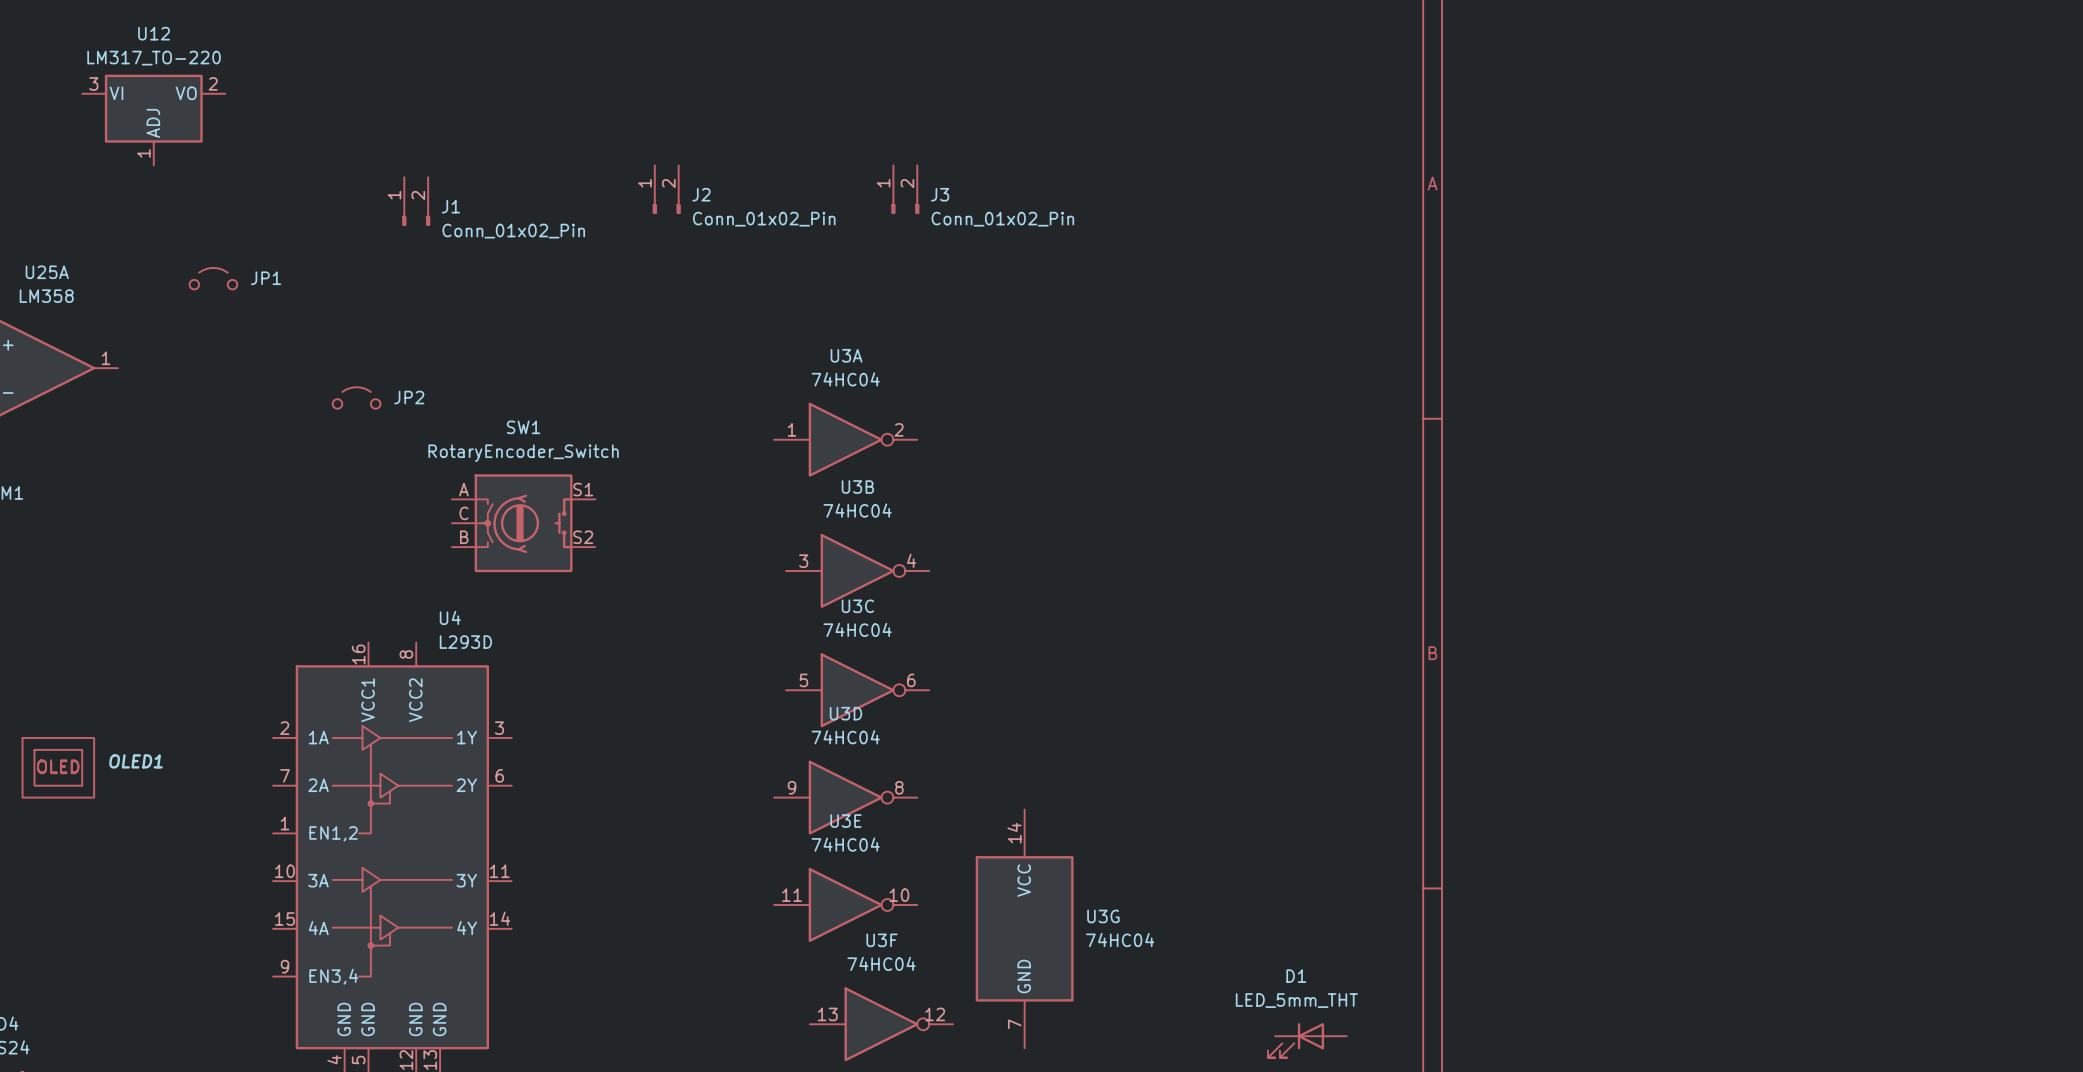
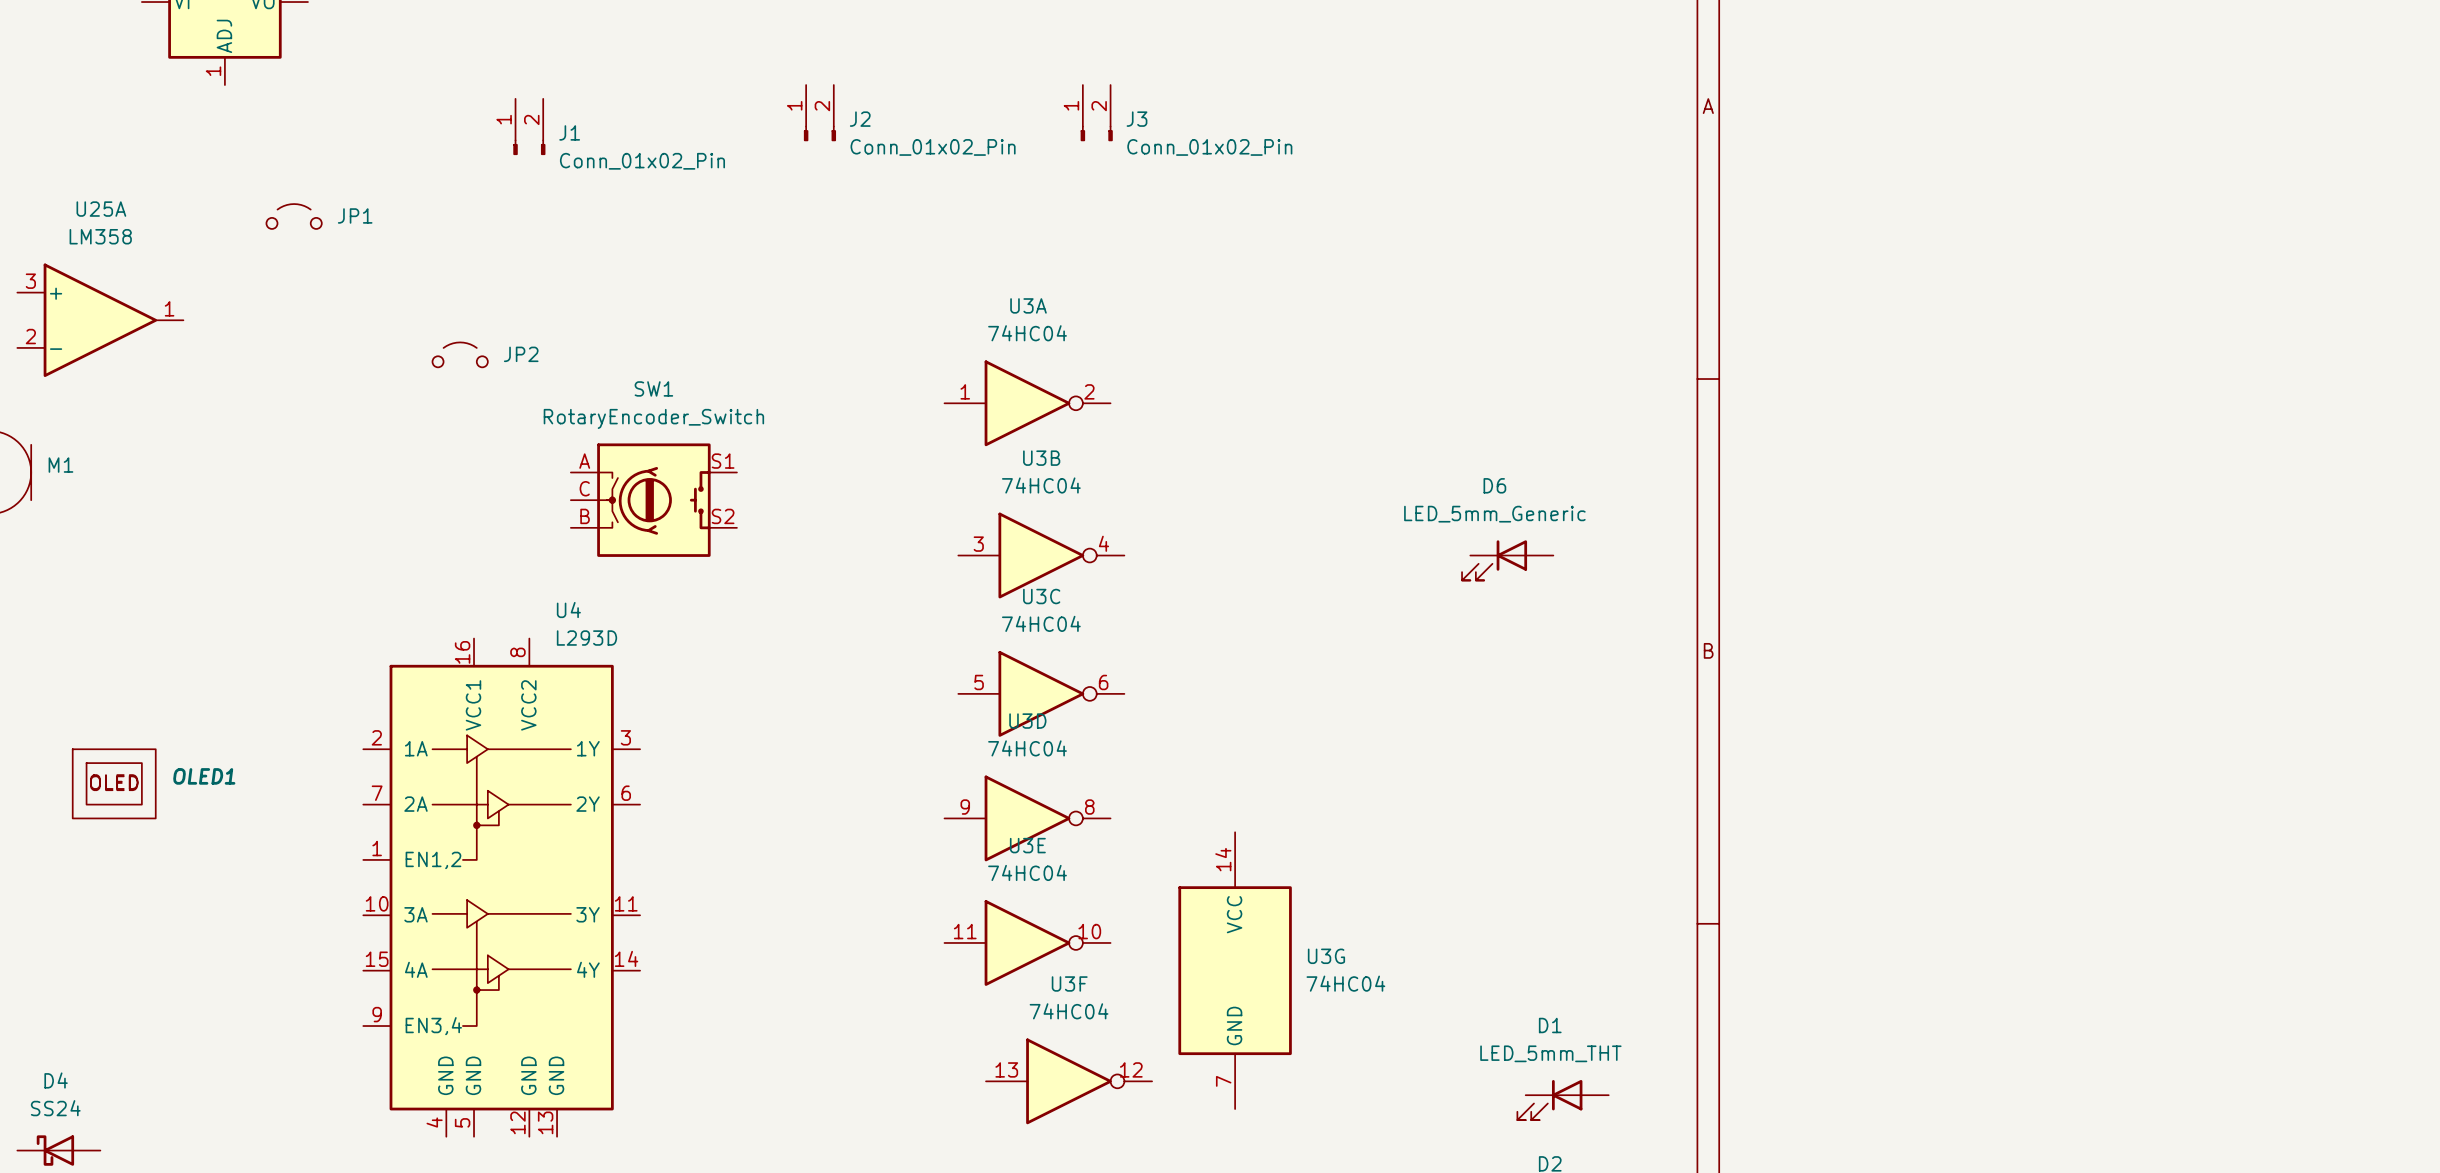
D6: none -> LED_5mm_Generic (1507, 560)

